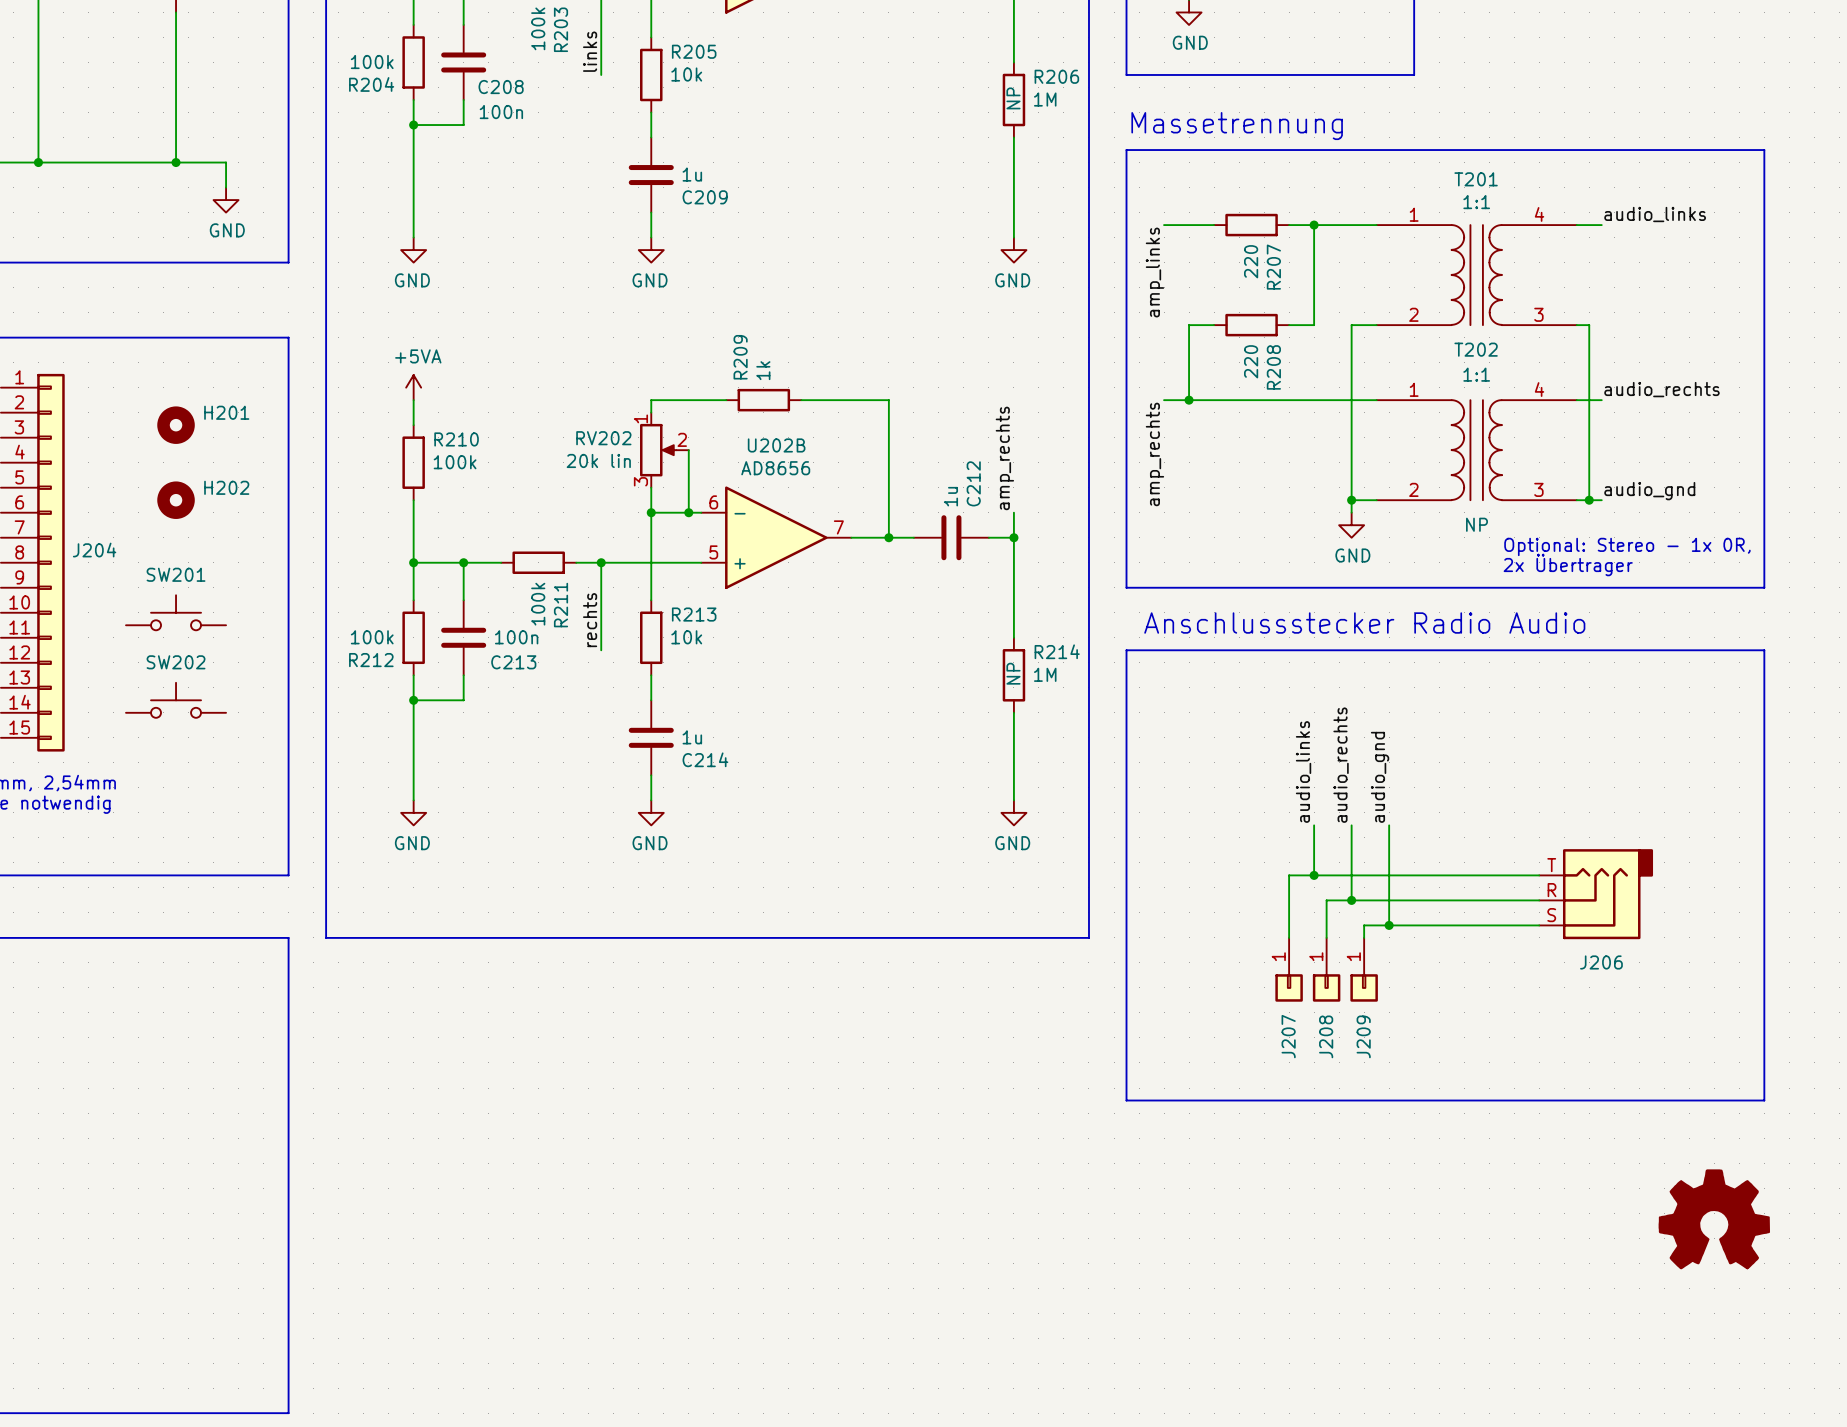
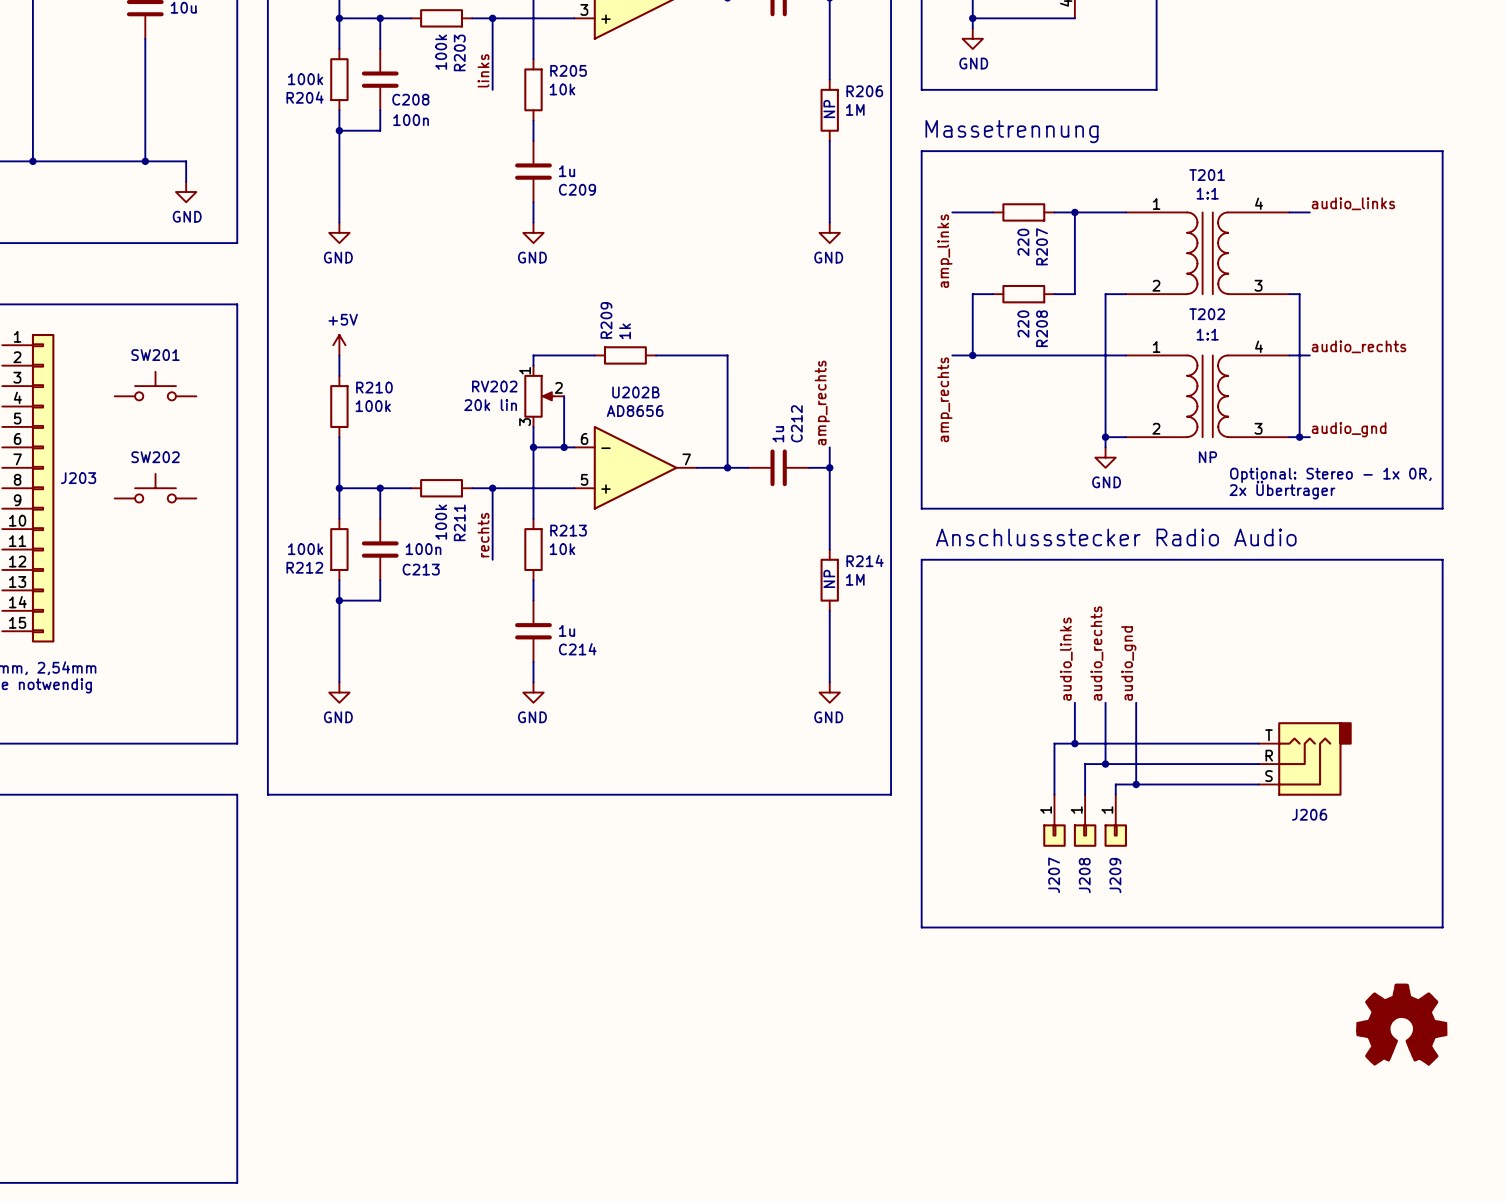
power symbol: +5VA (413, 387) -> +5V (339, 345)
H201: (176, 425) -> none
H202: (176, 500) -> none
J204 name: J204 (94, 550) -> J203 (78, 478)
SW201 position: (176, 612) -> (155, 386)
SW202 position: (176, 700) -> (155, 488)

